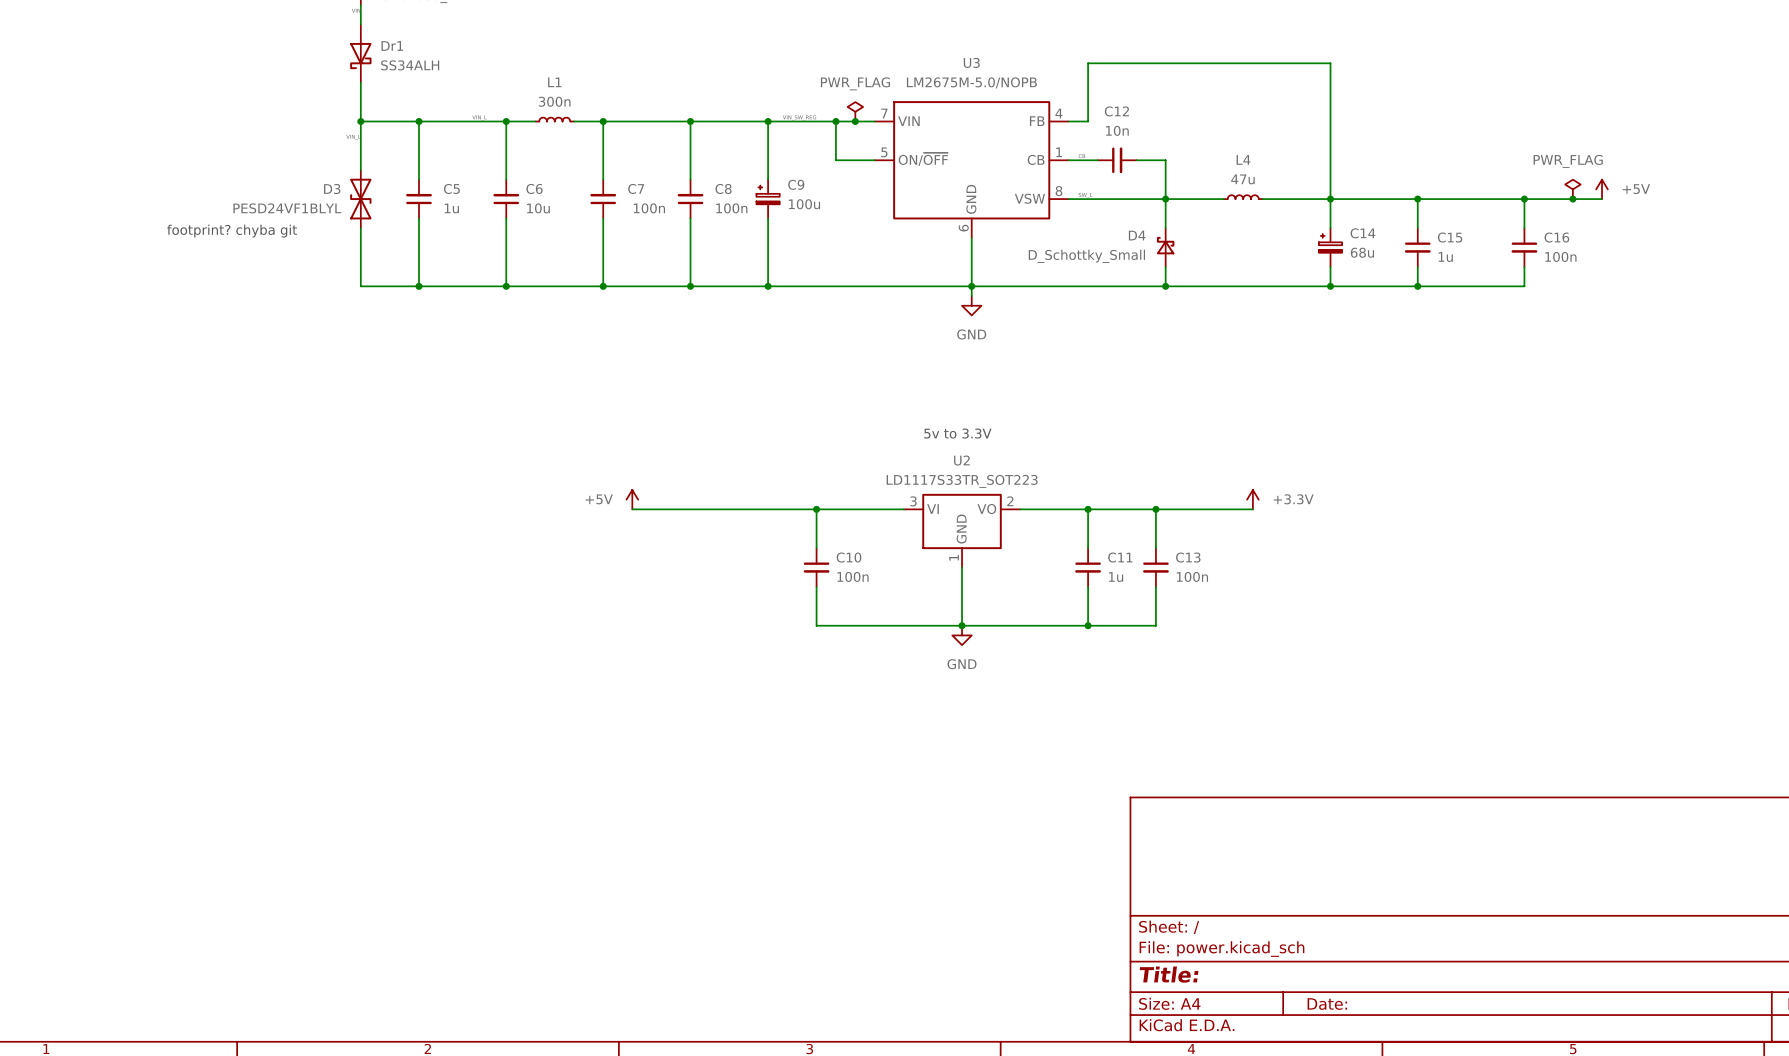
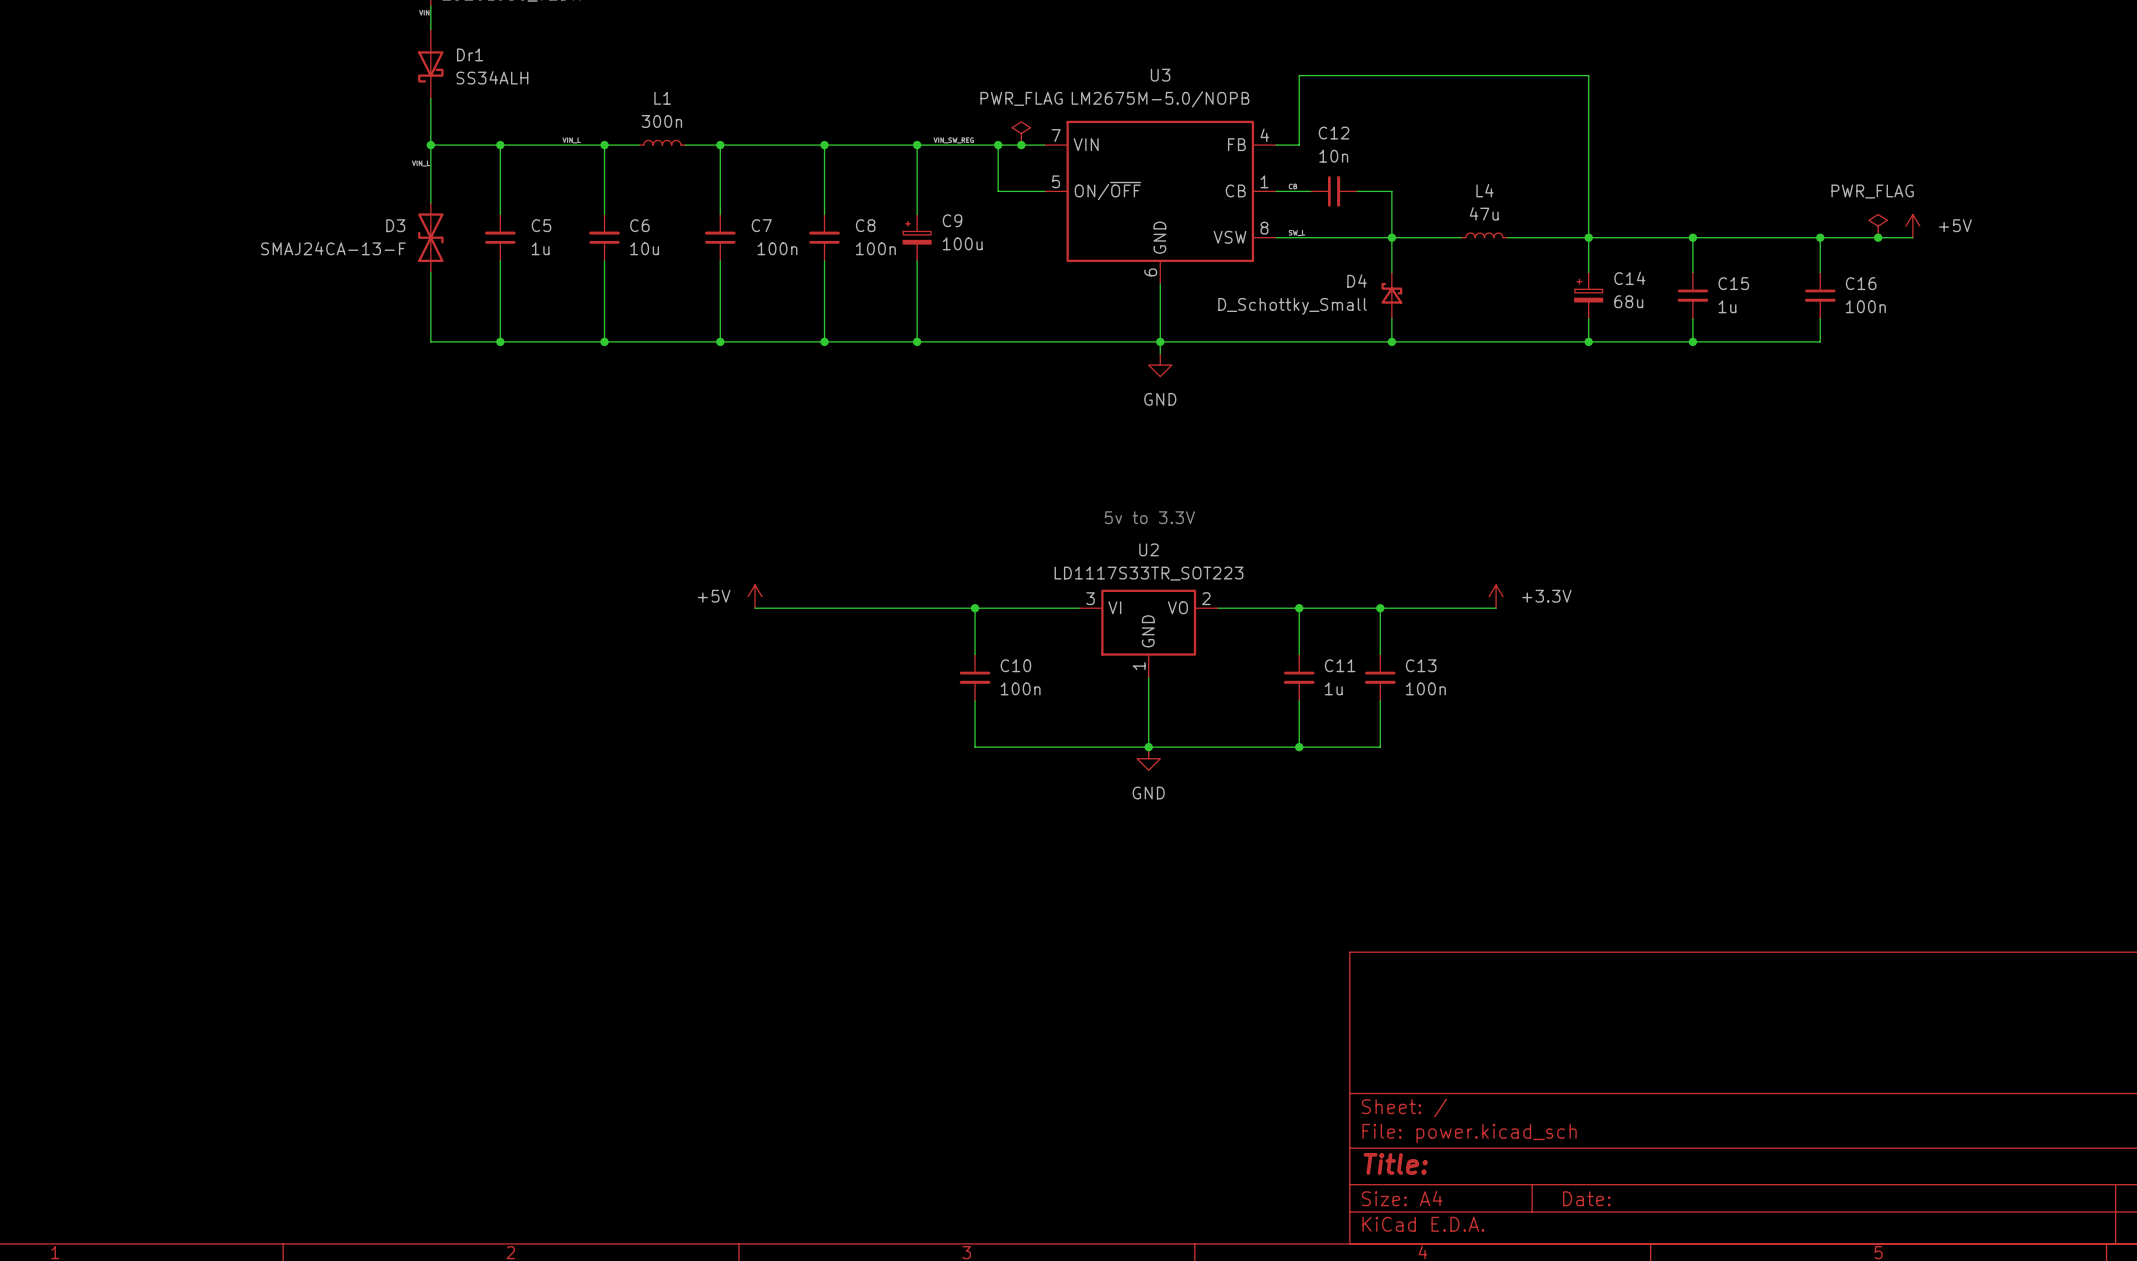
D3 value: PESD24VF1BLYL (287, 208) -> SMAJ24CA-13-F (333, 248)
text: footprint? chyba git (232, 231) -> none

